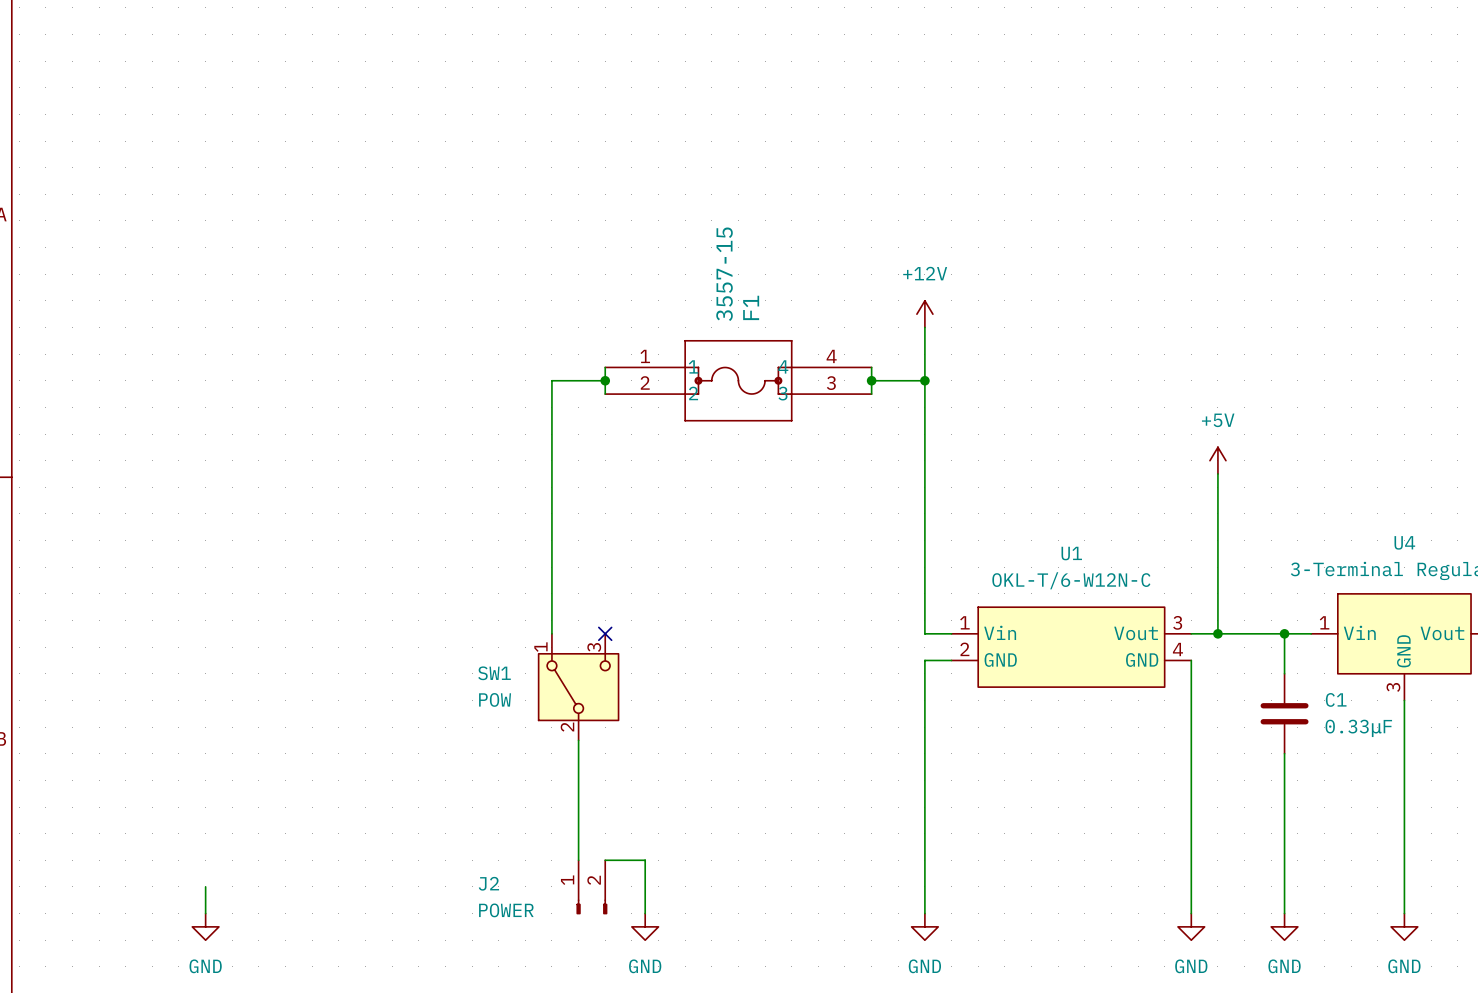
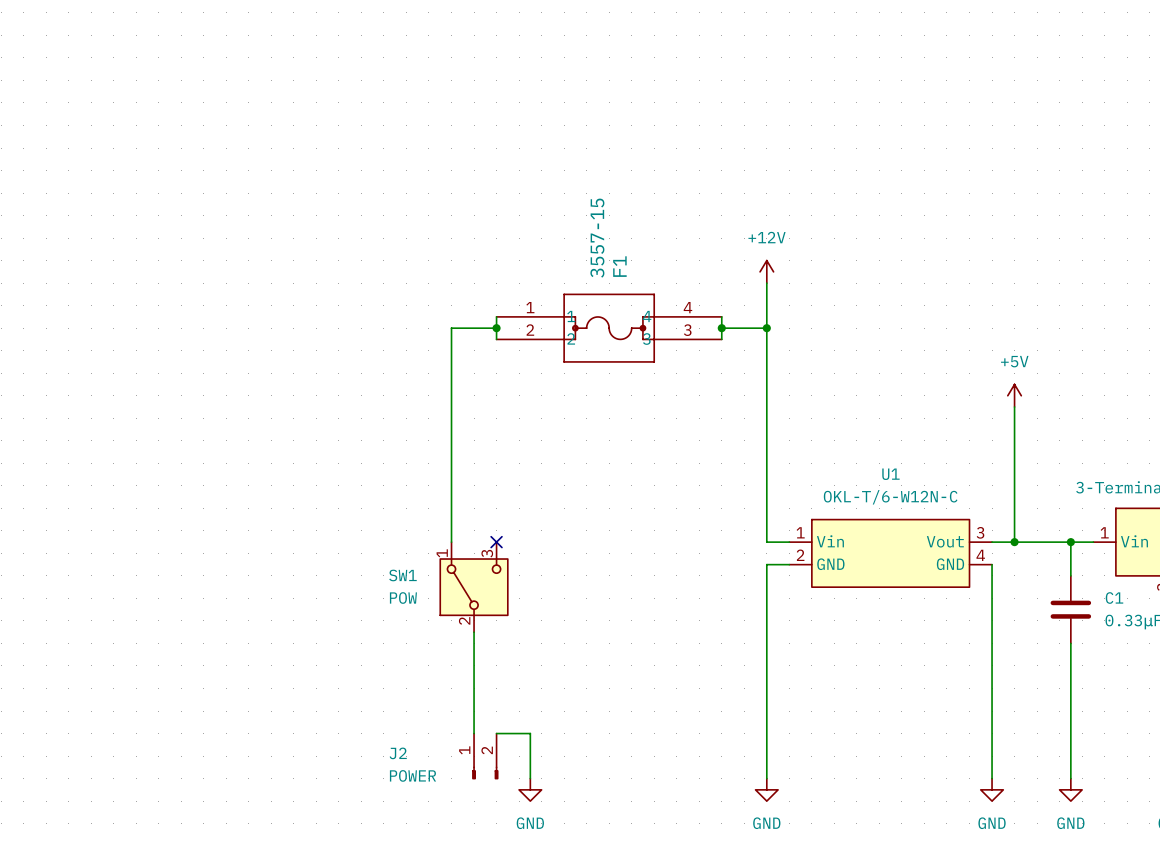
wire: (205, 886) (205, 913) -> none
power symbol: GND (205, 926) -> none

